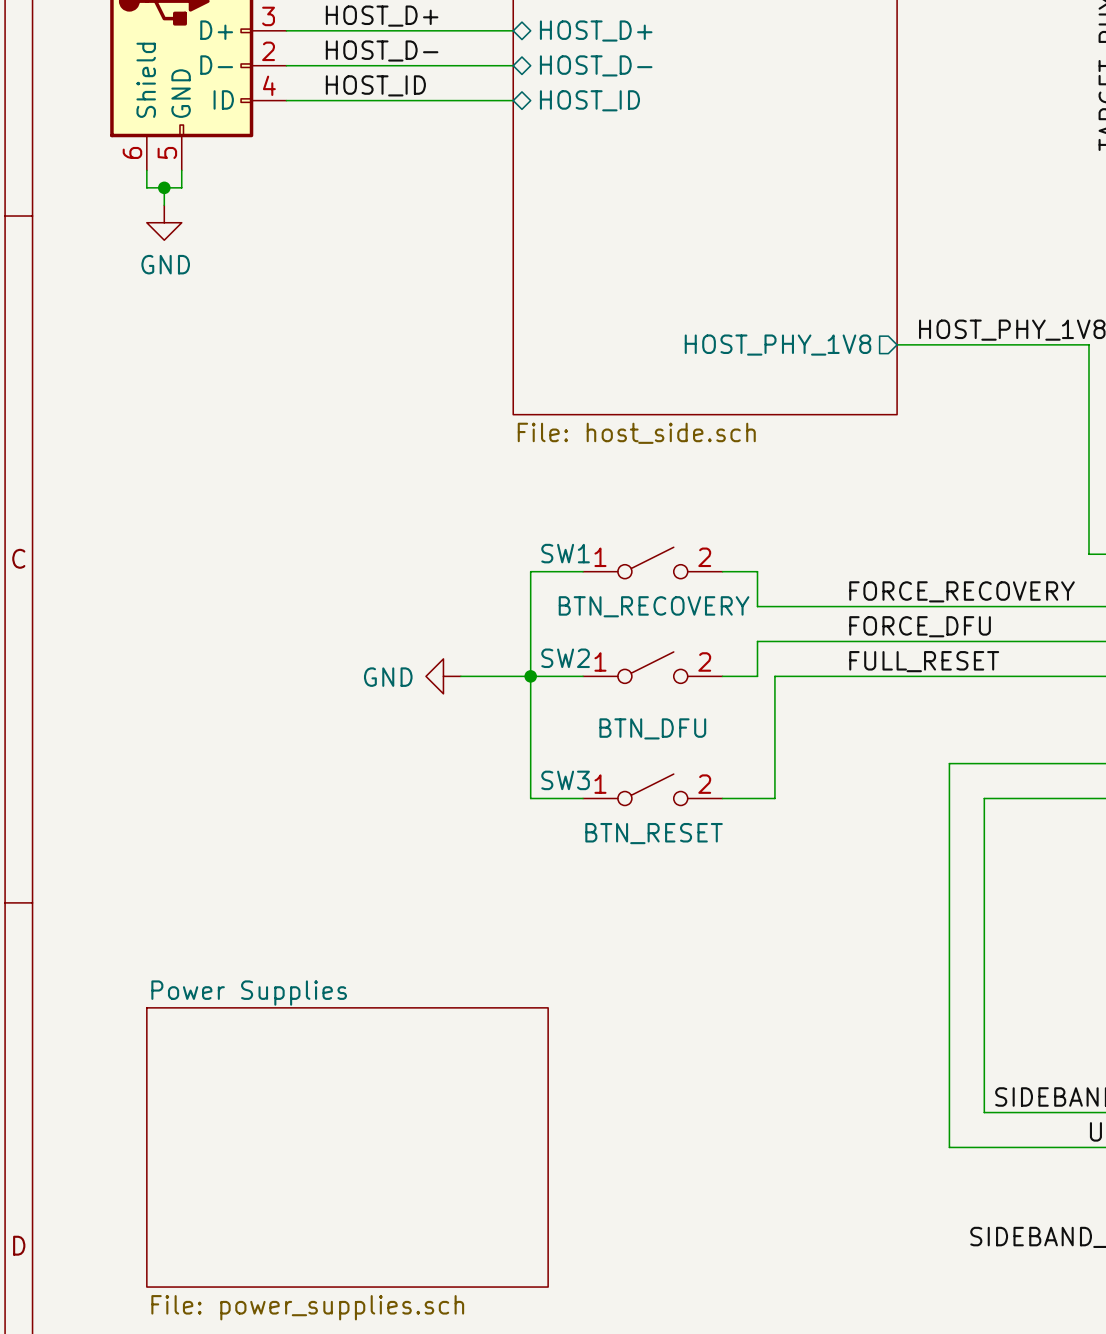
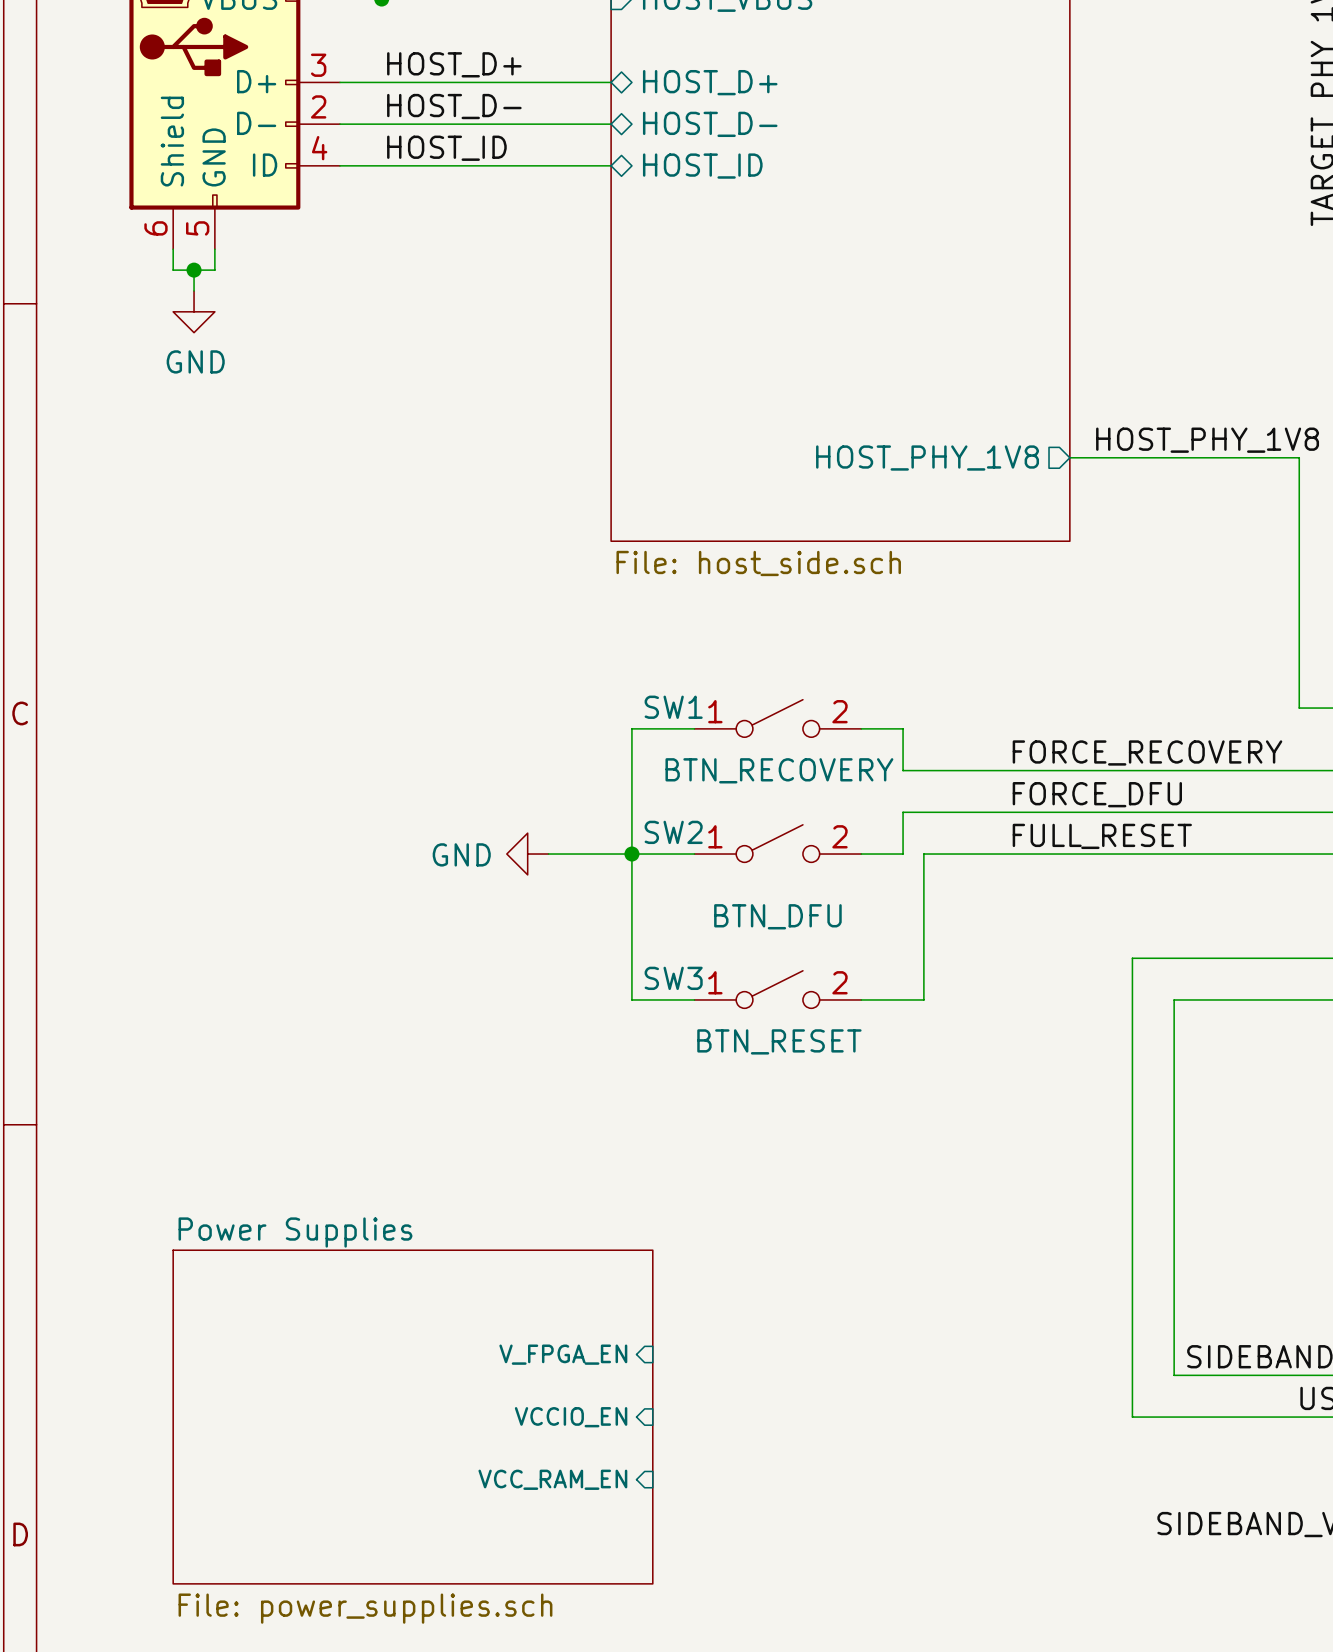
sheet pin: none -> V_FPGA_EN (563, 1354)
sheet pin: none -> VCCIO_EN (571, 1417)
sheet pin: none -> VCC_RAM_EN (552, 1479)

